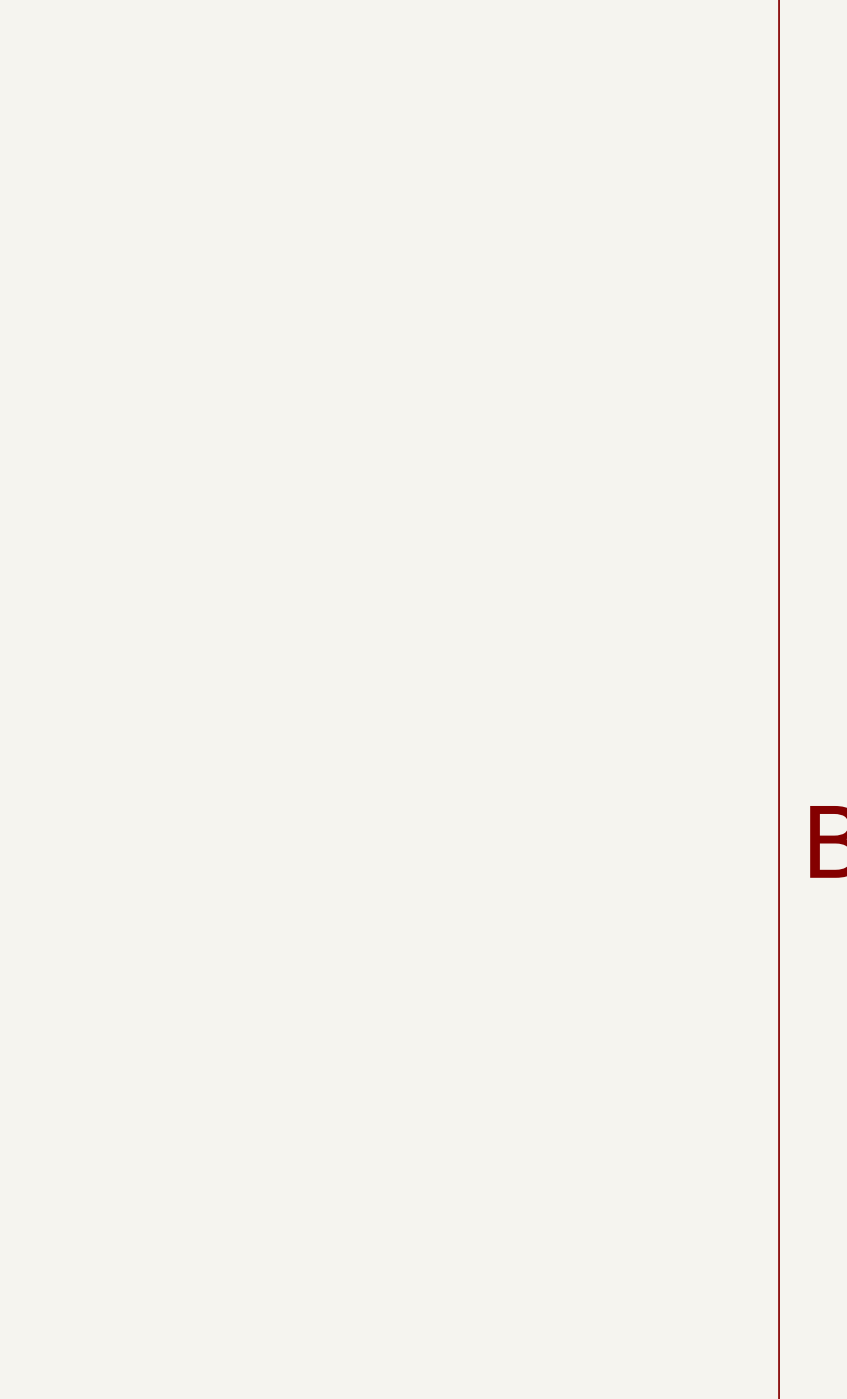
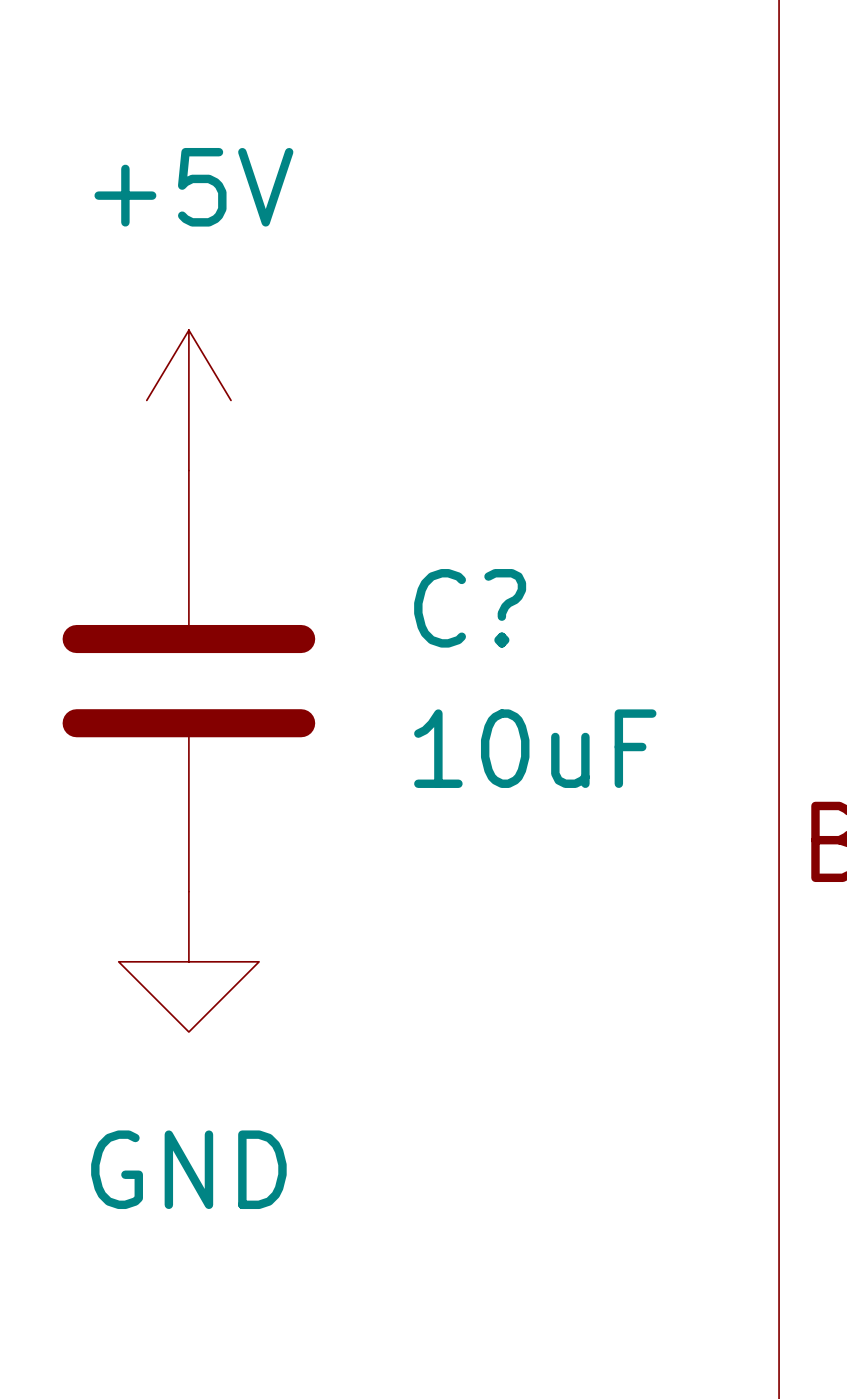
power symbol: none -> +5V (188, 400)
C?: none -> 10uF (188, 681)
power symbol: none -> GND (188, 961)

